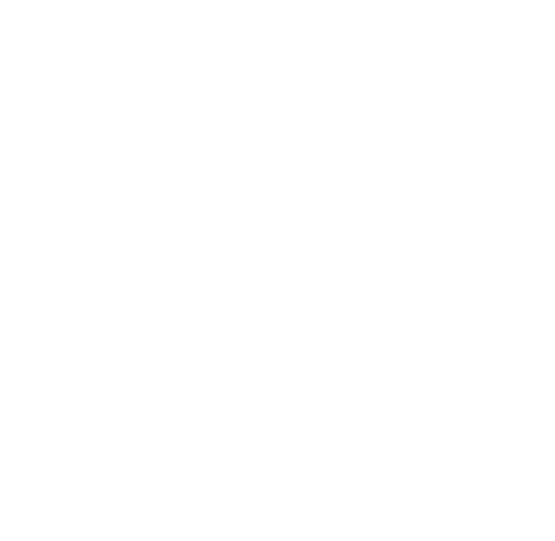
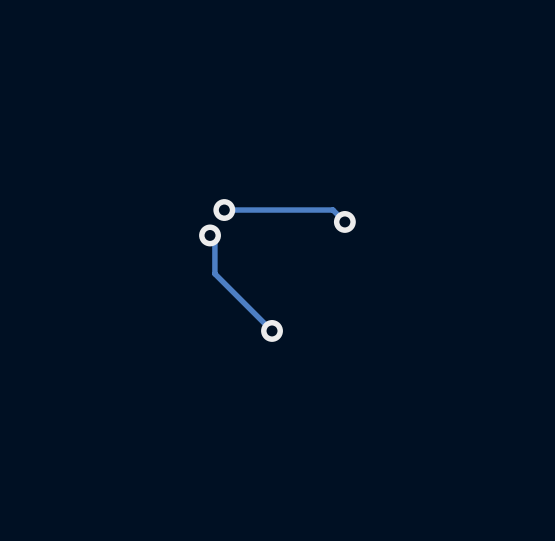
track: none -> (224, 210) (332, 210) (344, 221)
via: none -> (224, 210)
via: none -> (344, 221)
track: none -> (210, 235) (214, 239) (214, 273) (272, 330)
via: none -> (210, 235)
via: none -> (272, 330)

